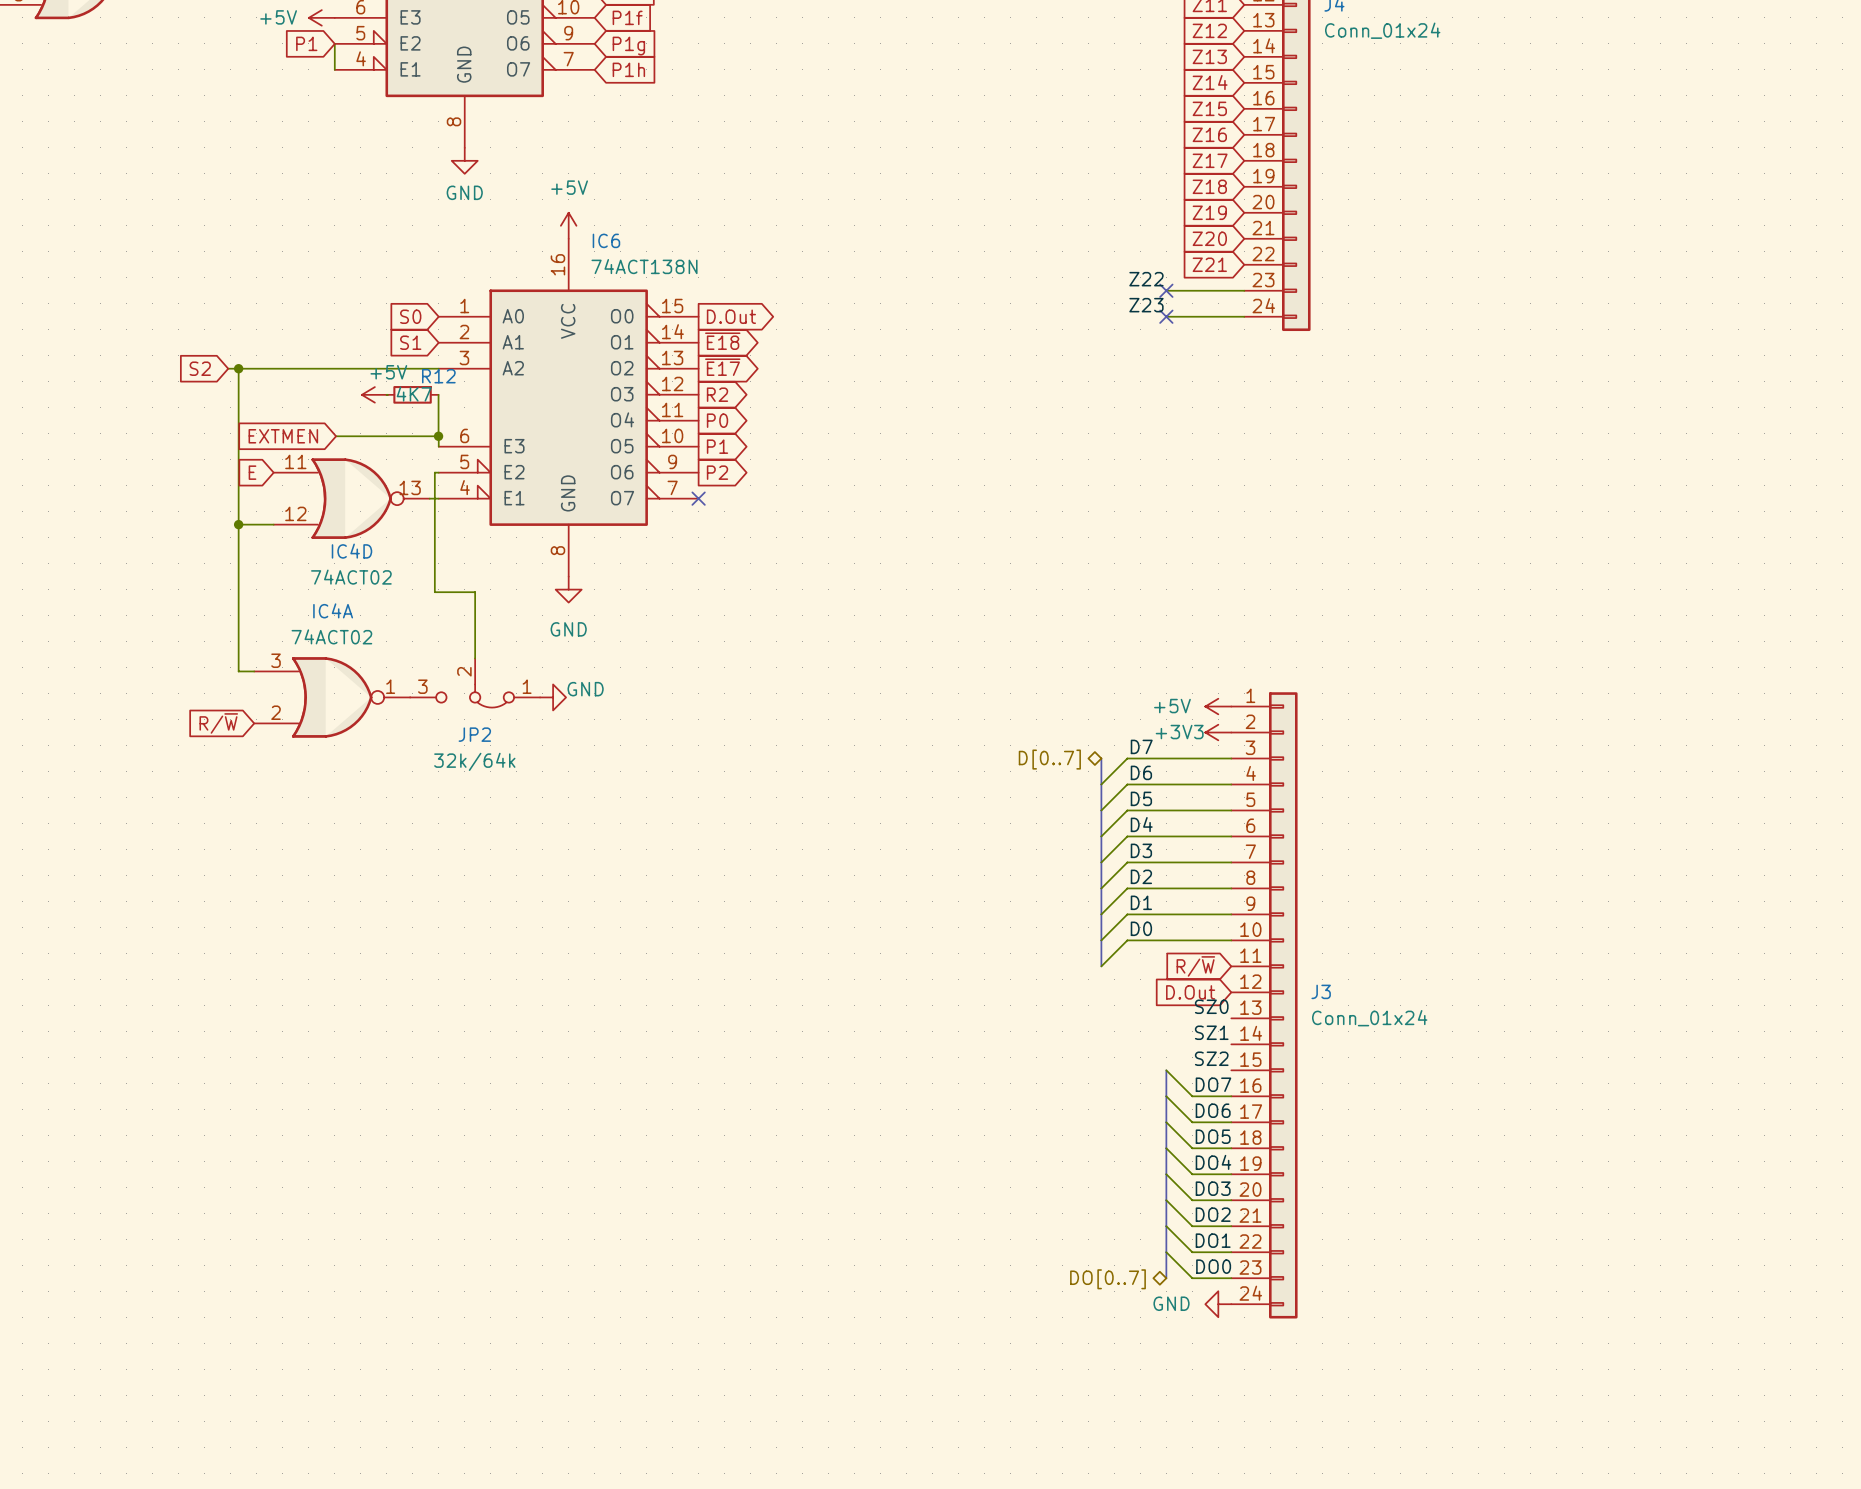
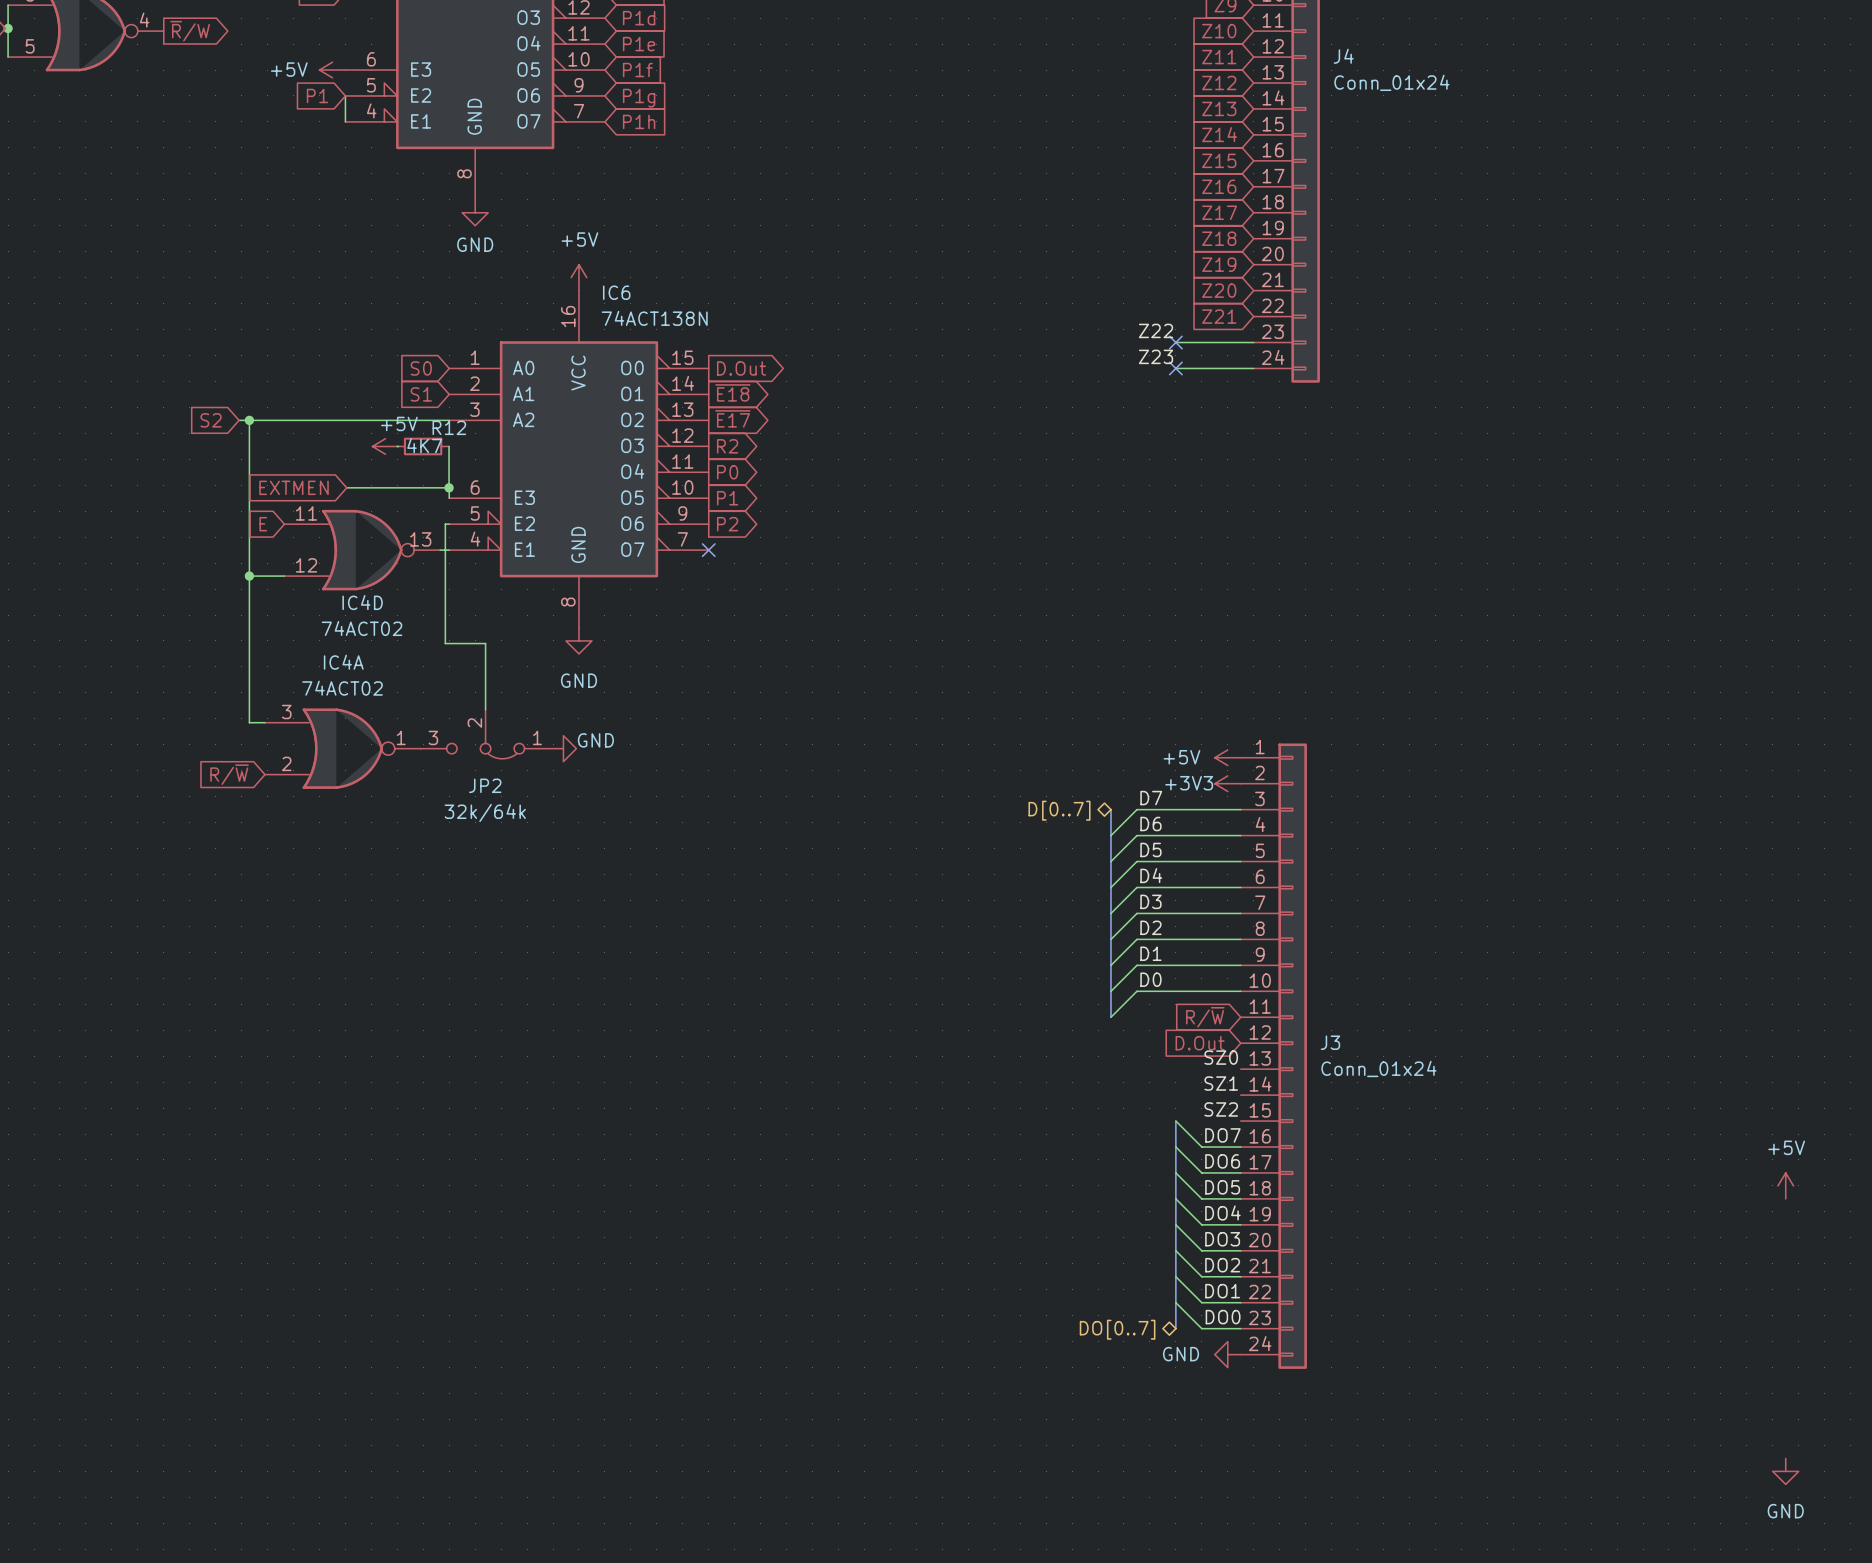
power symbol: none -> +5V (1785, 1185)
power symbol: none -> GND (1785, 1471)

